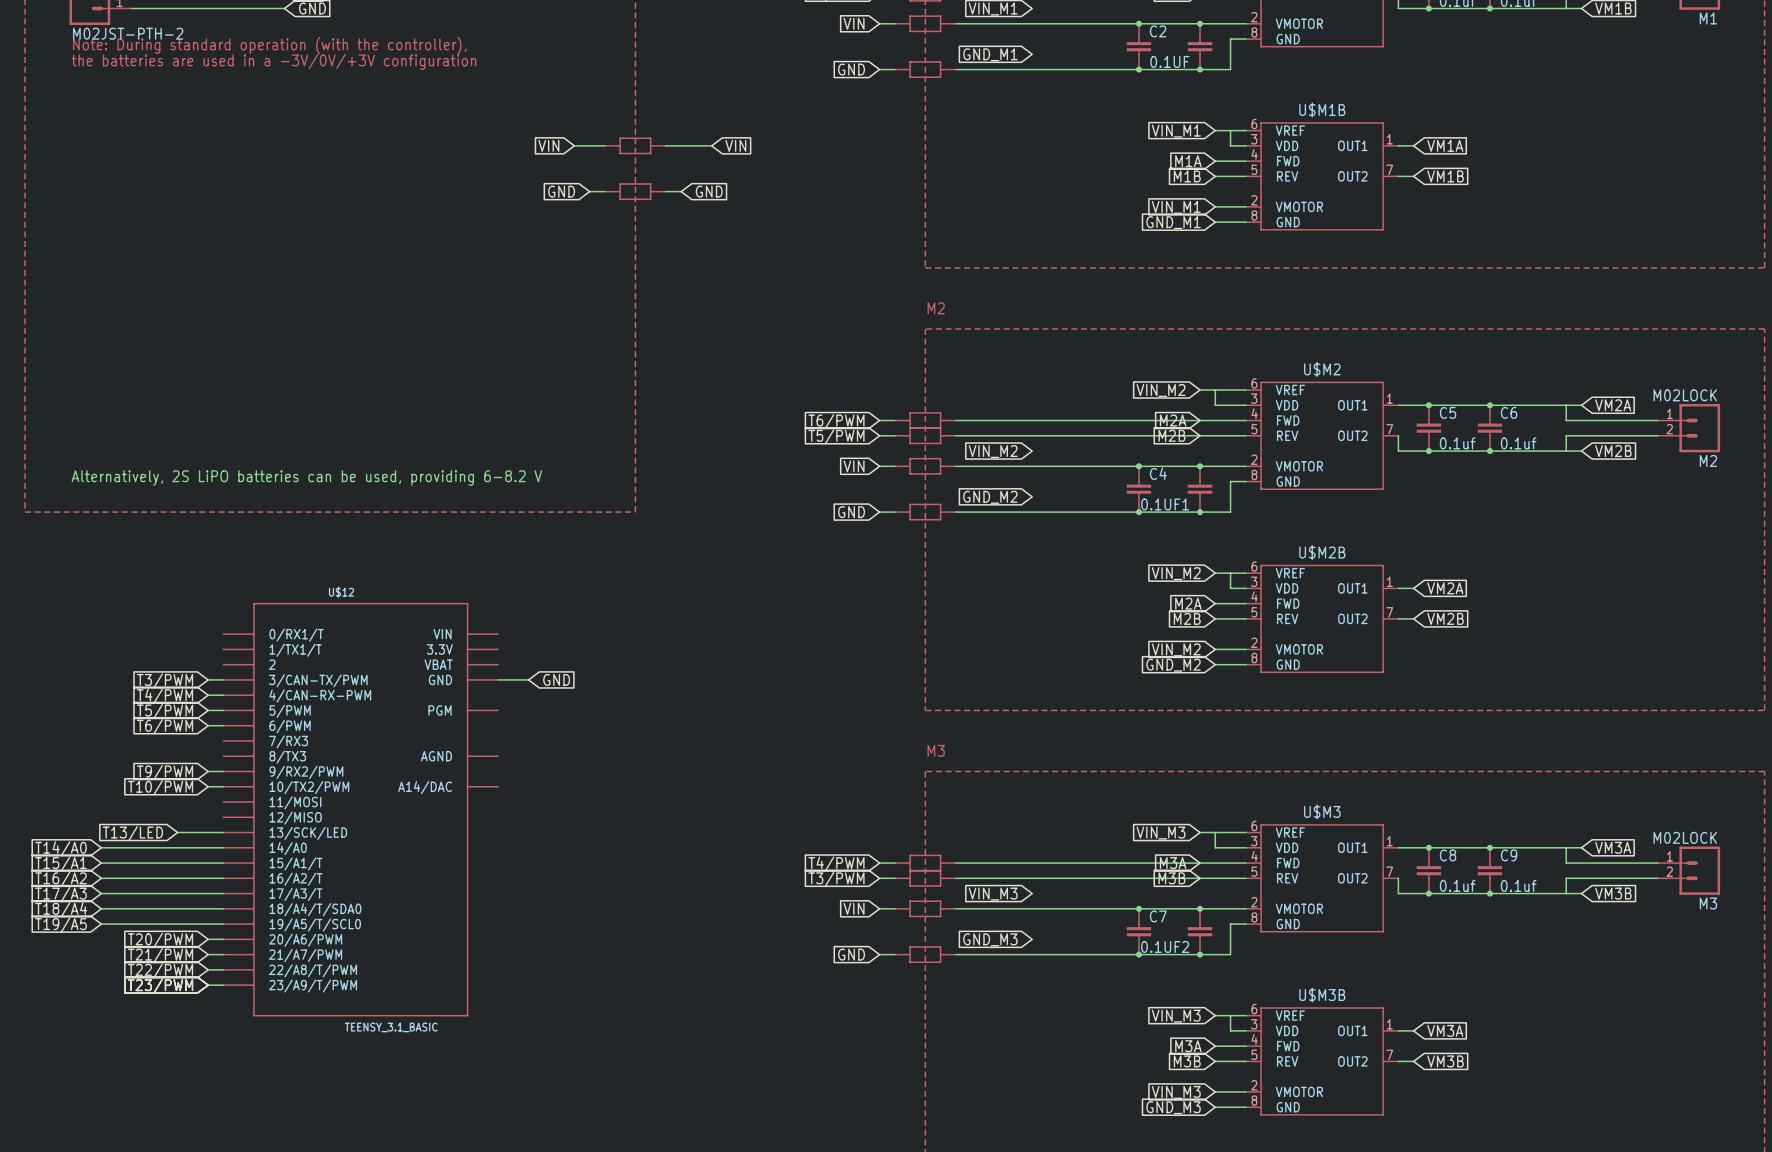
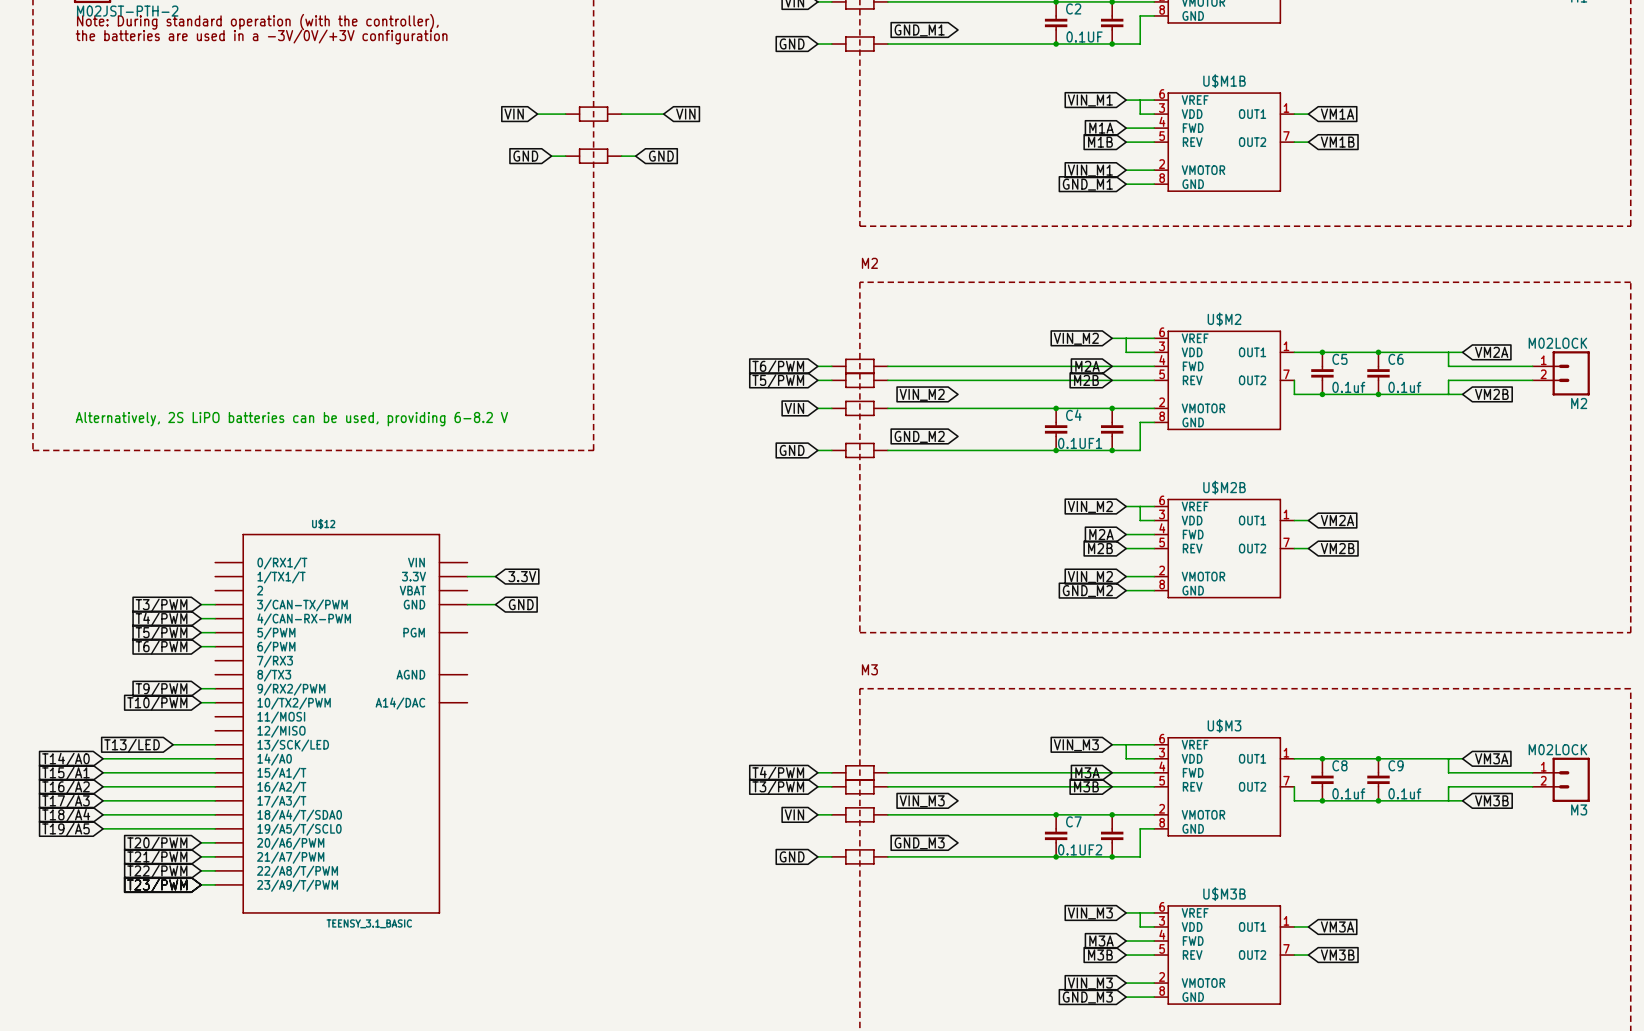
wire: none -> (467, 576) (495, 576)
global label: none -> 3.3V (522, 576)

